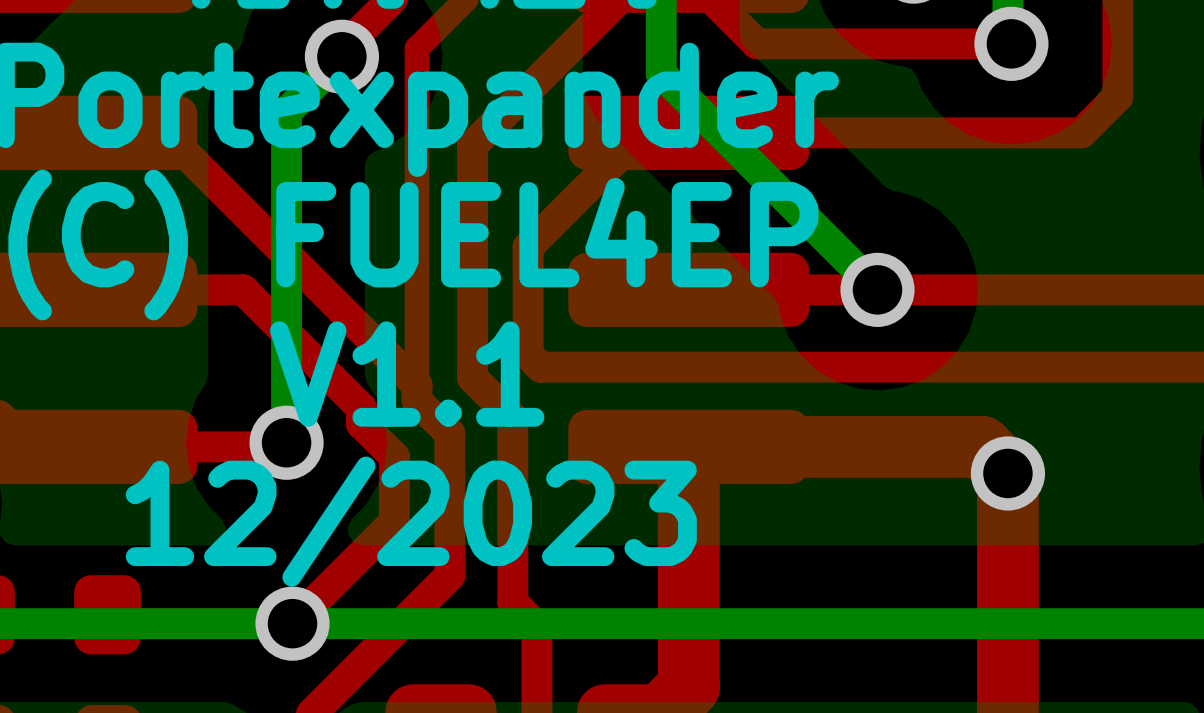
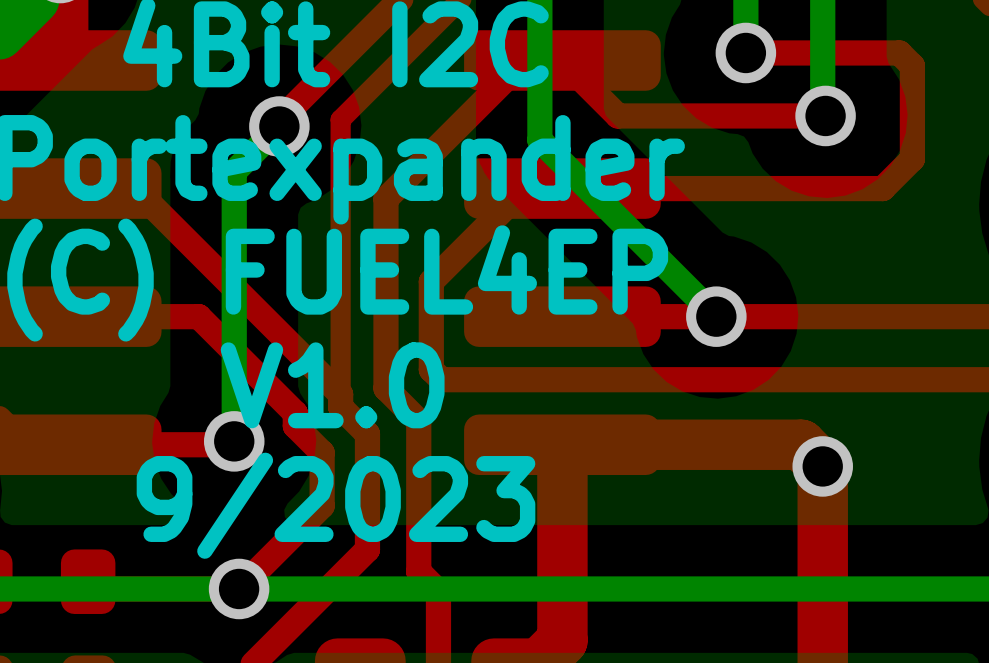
text: V1.1 (407, 374) -> V1.0 (332, 385)
text: 12/2023 (411, 521) -> 9/2023 (336, 505)

